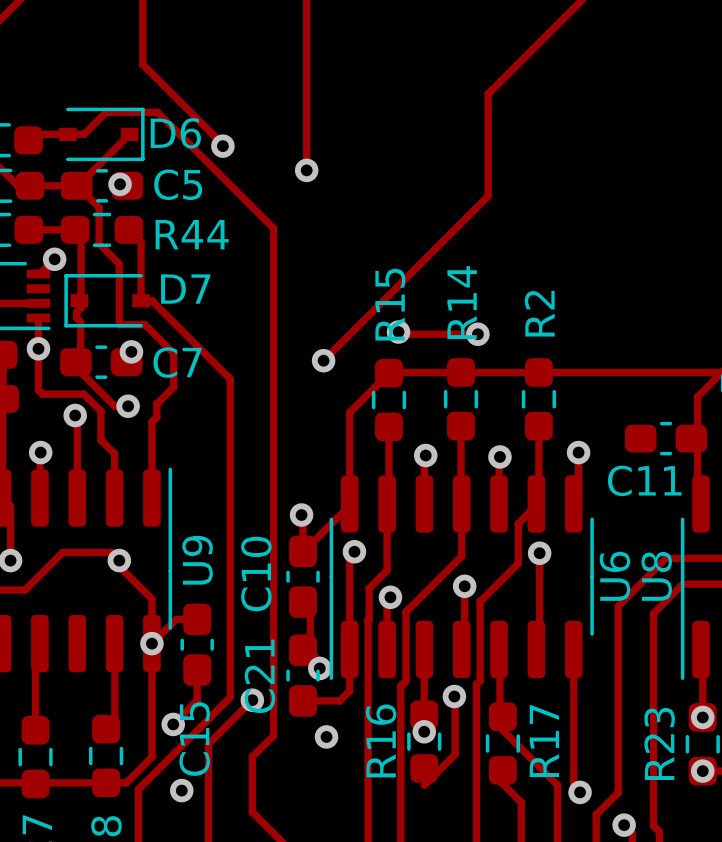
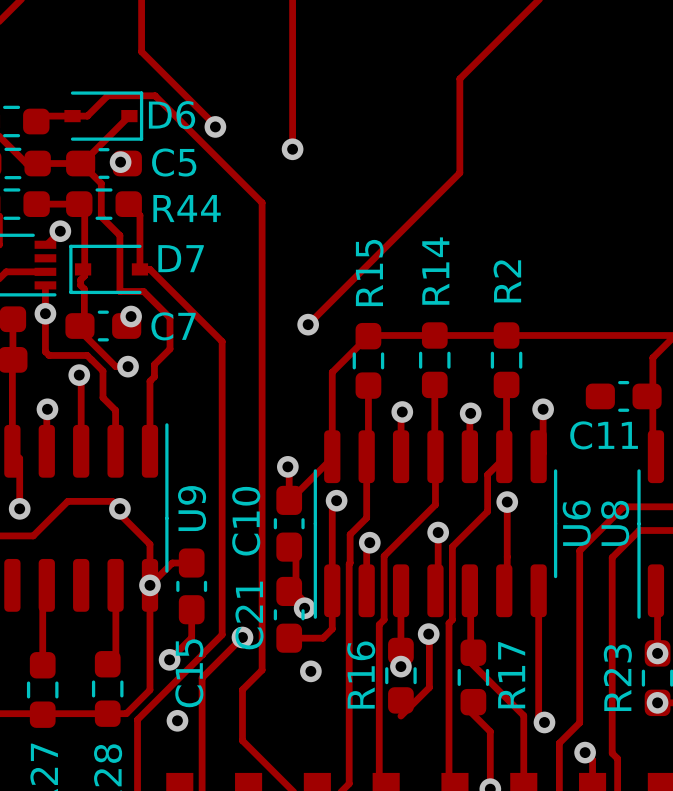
track: (398, 332) (400, 334) (477, 334) -> none
via: (398, 332) -> none
via: (477, 334) -> none

